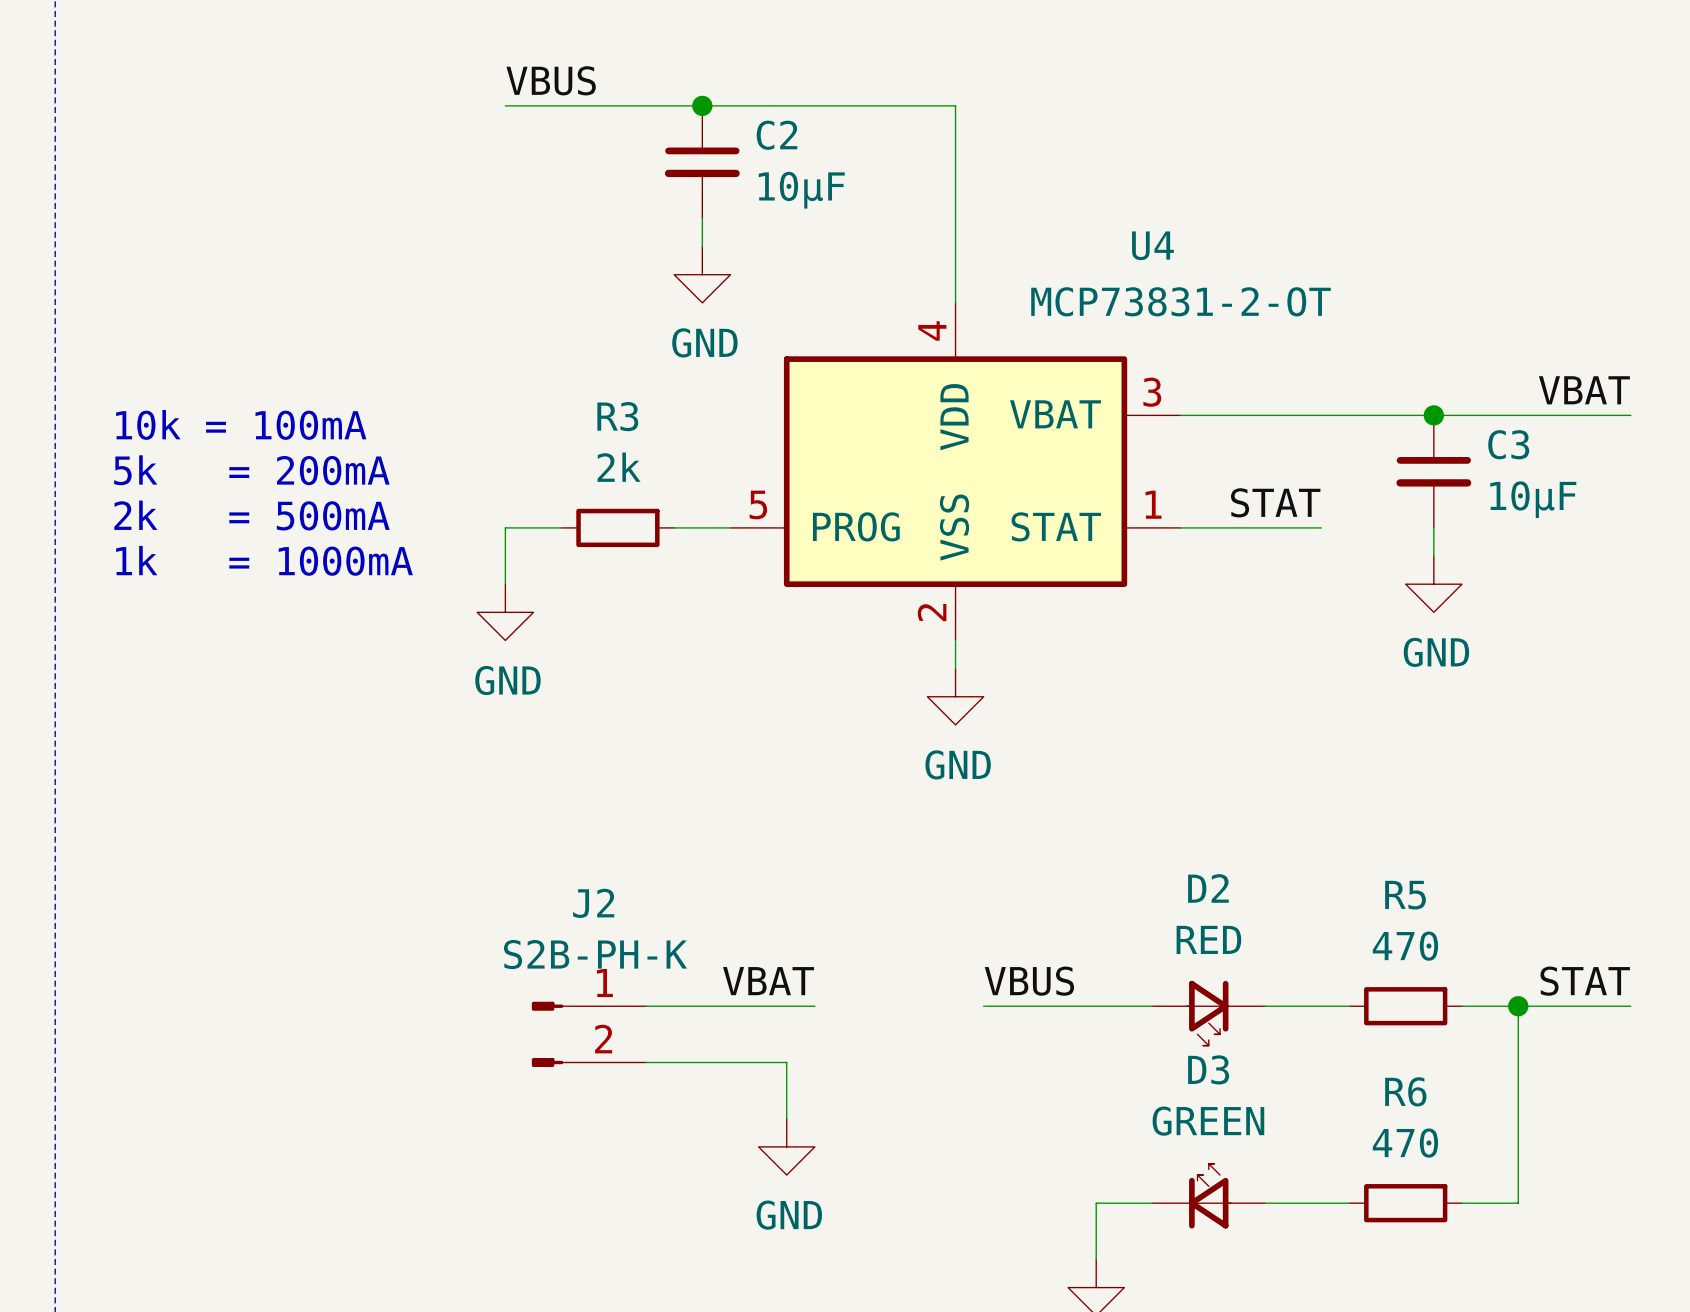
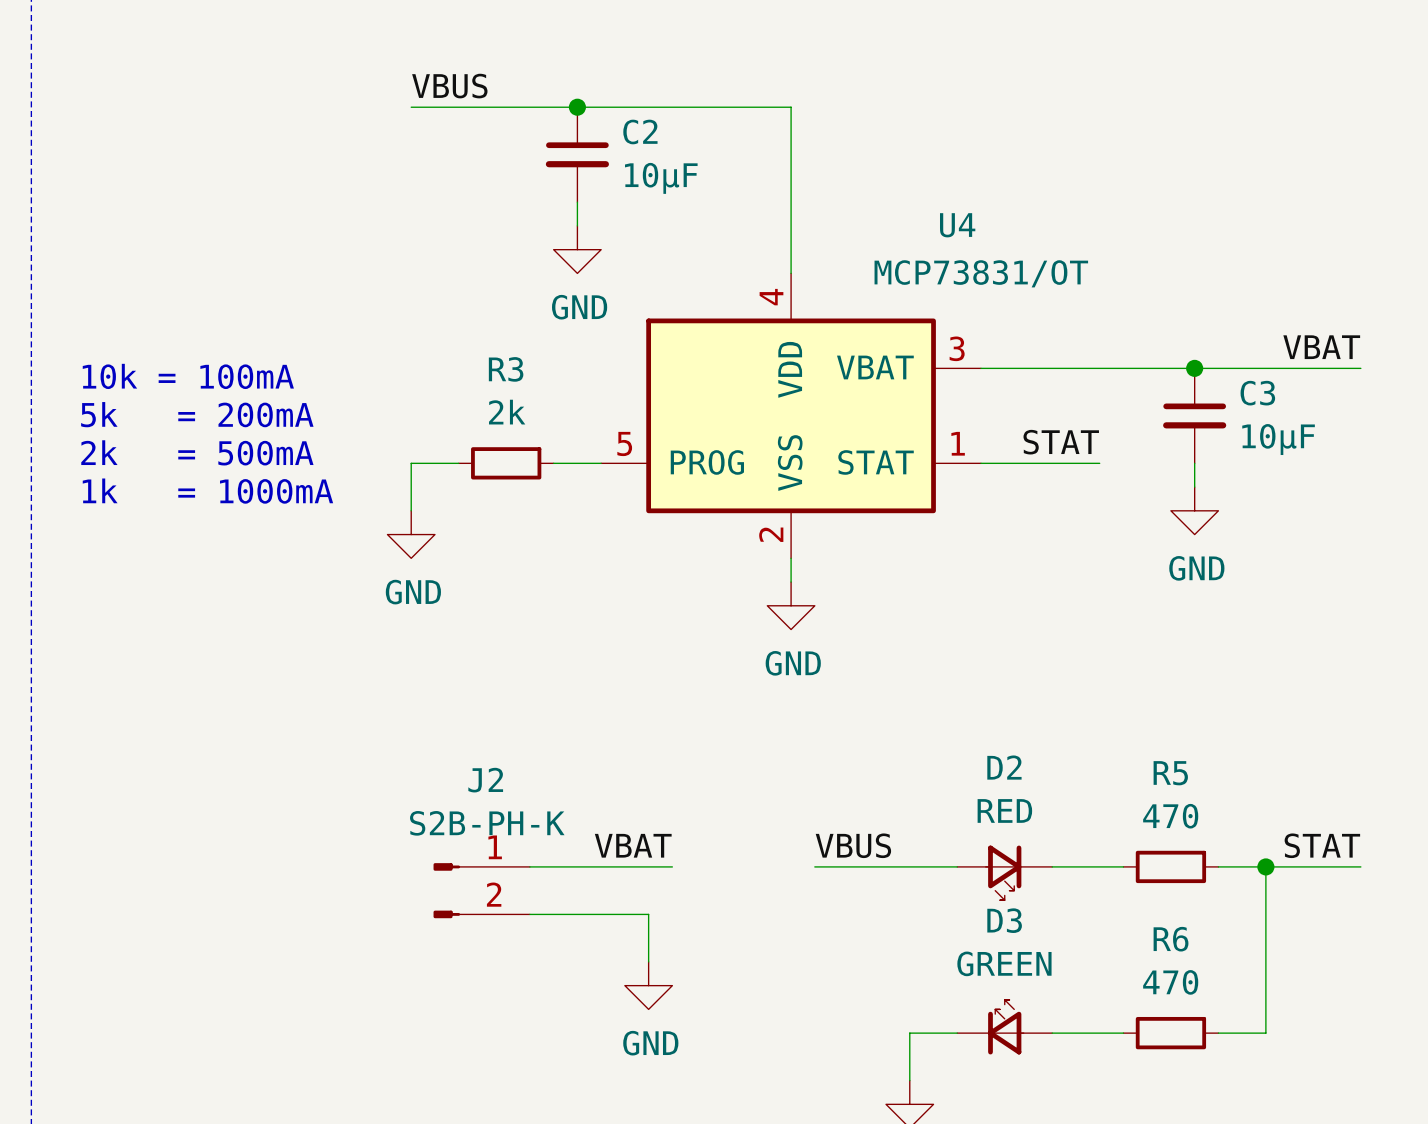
U4 value: MCP73831-2-OT (1180, 301) -> MCP73831/OT (981, 273)

